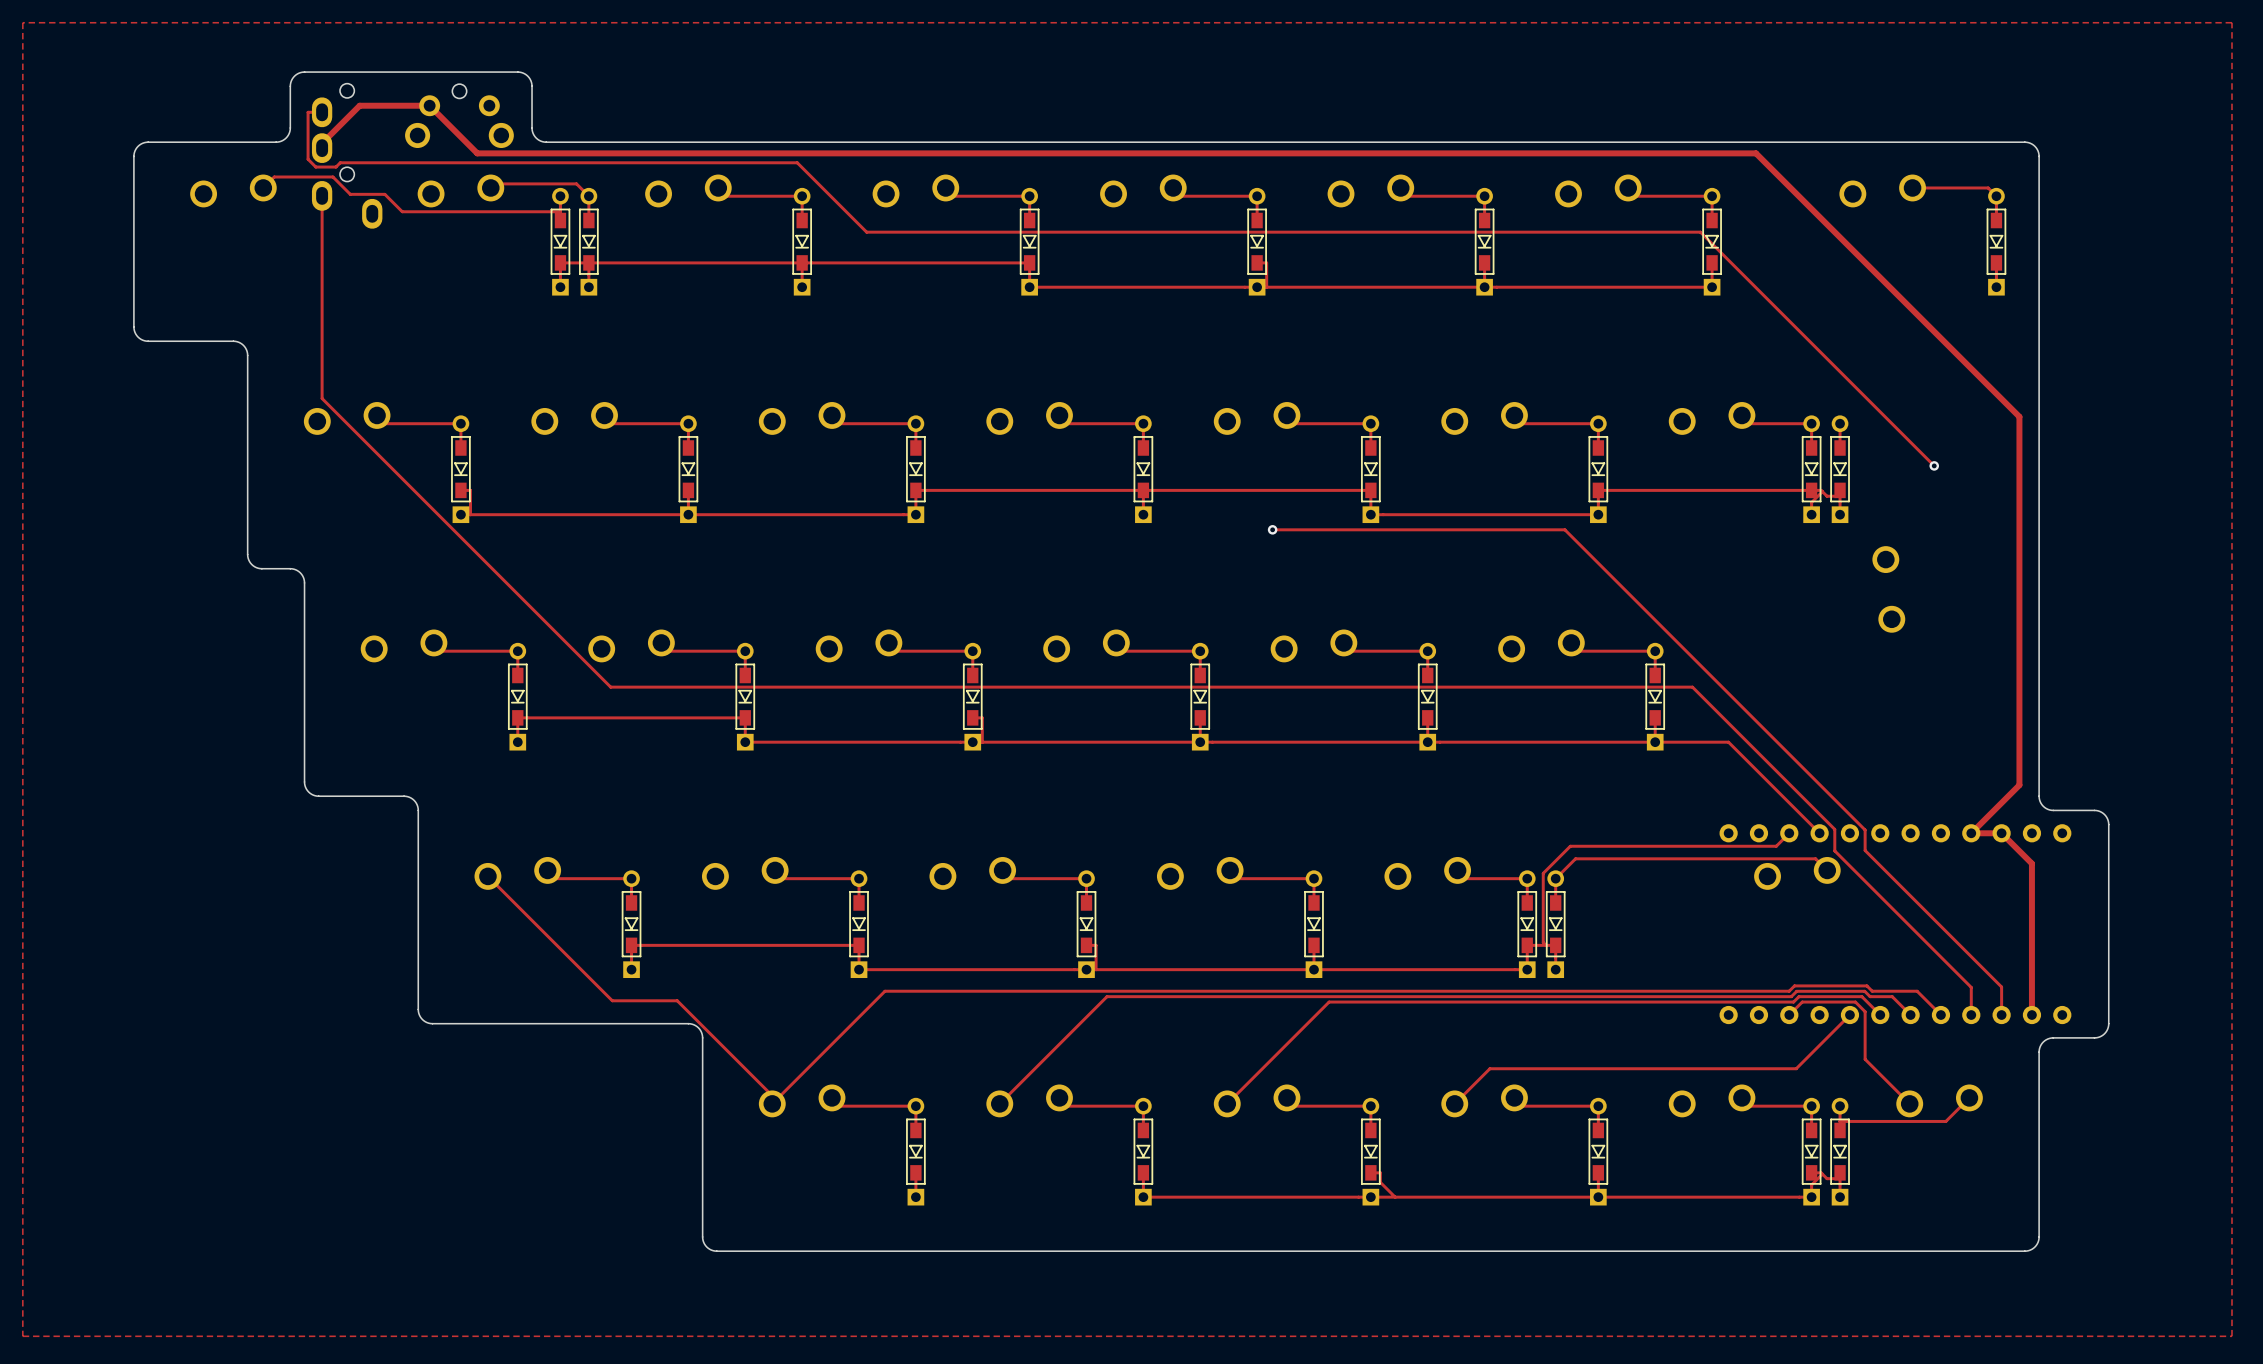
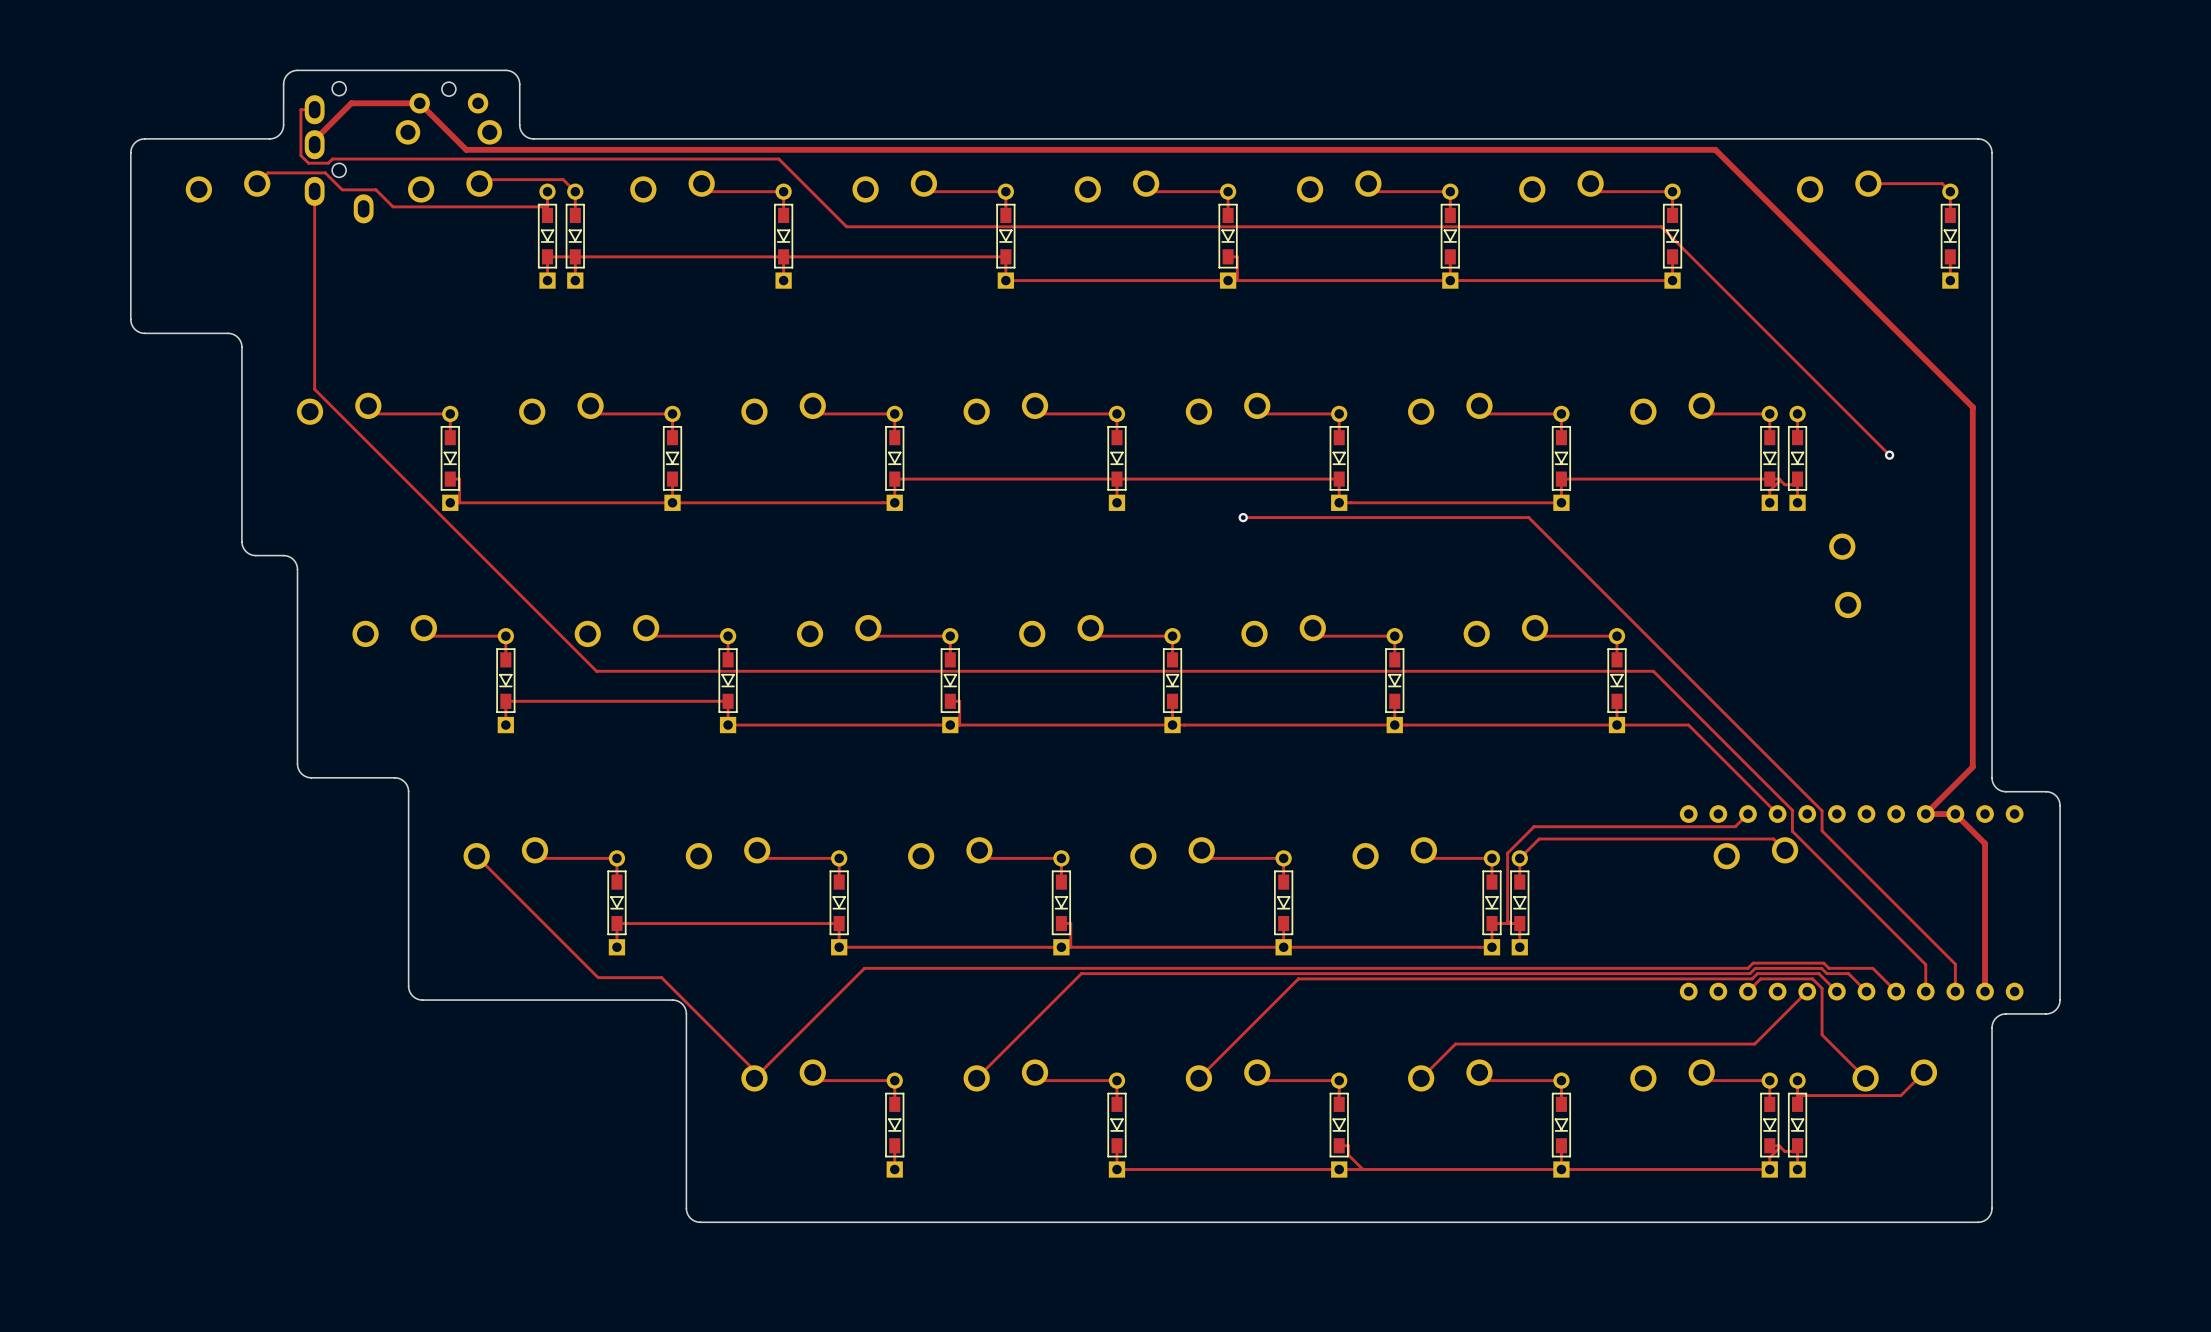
zone outline: (22, 22) (22, 1336) (2231, 1336) (2231, 22) (22, 22) -> none

